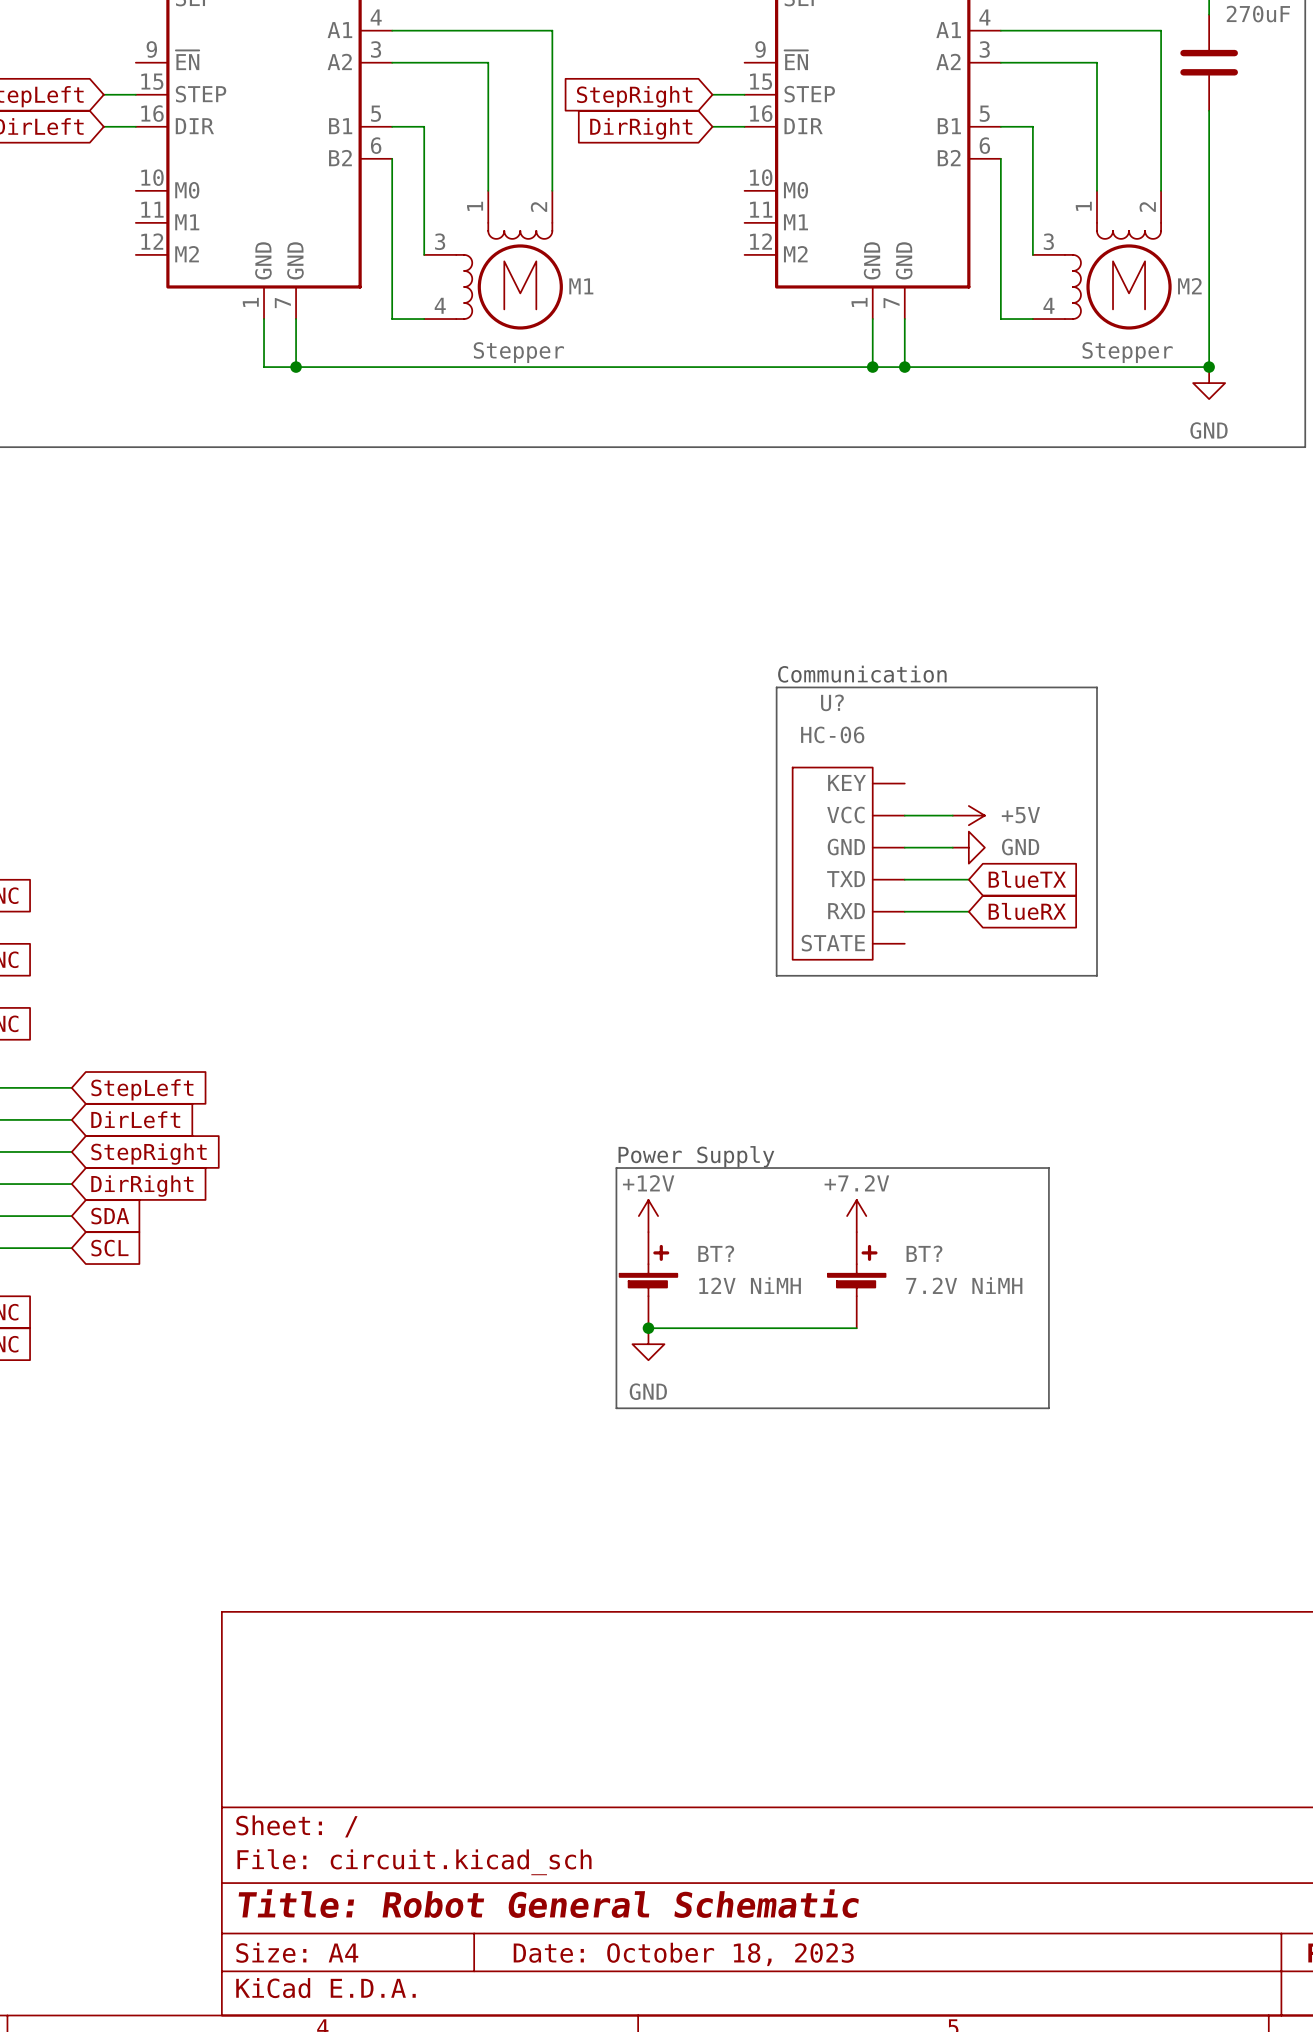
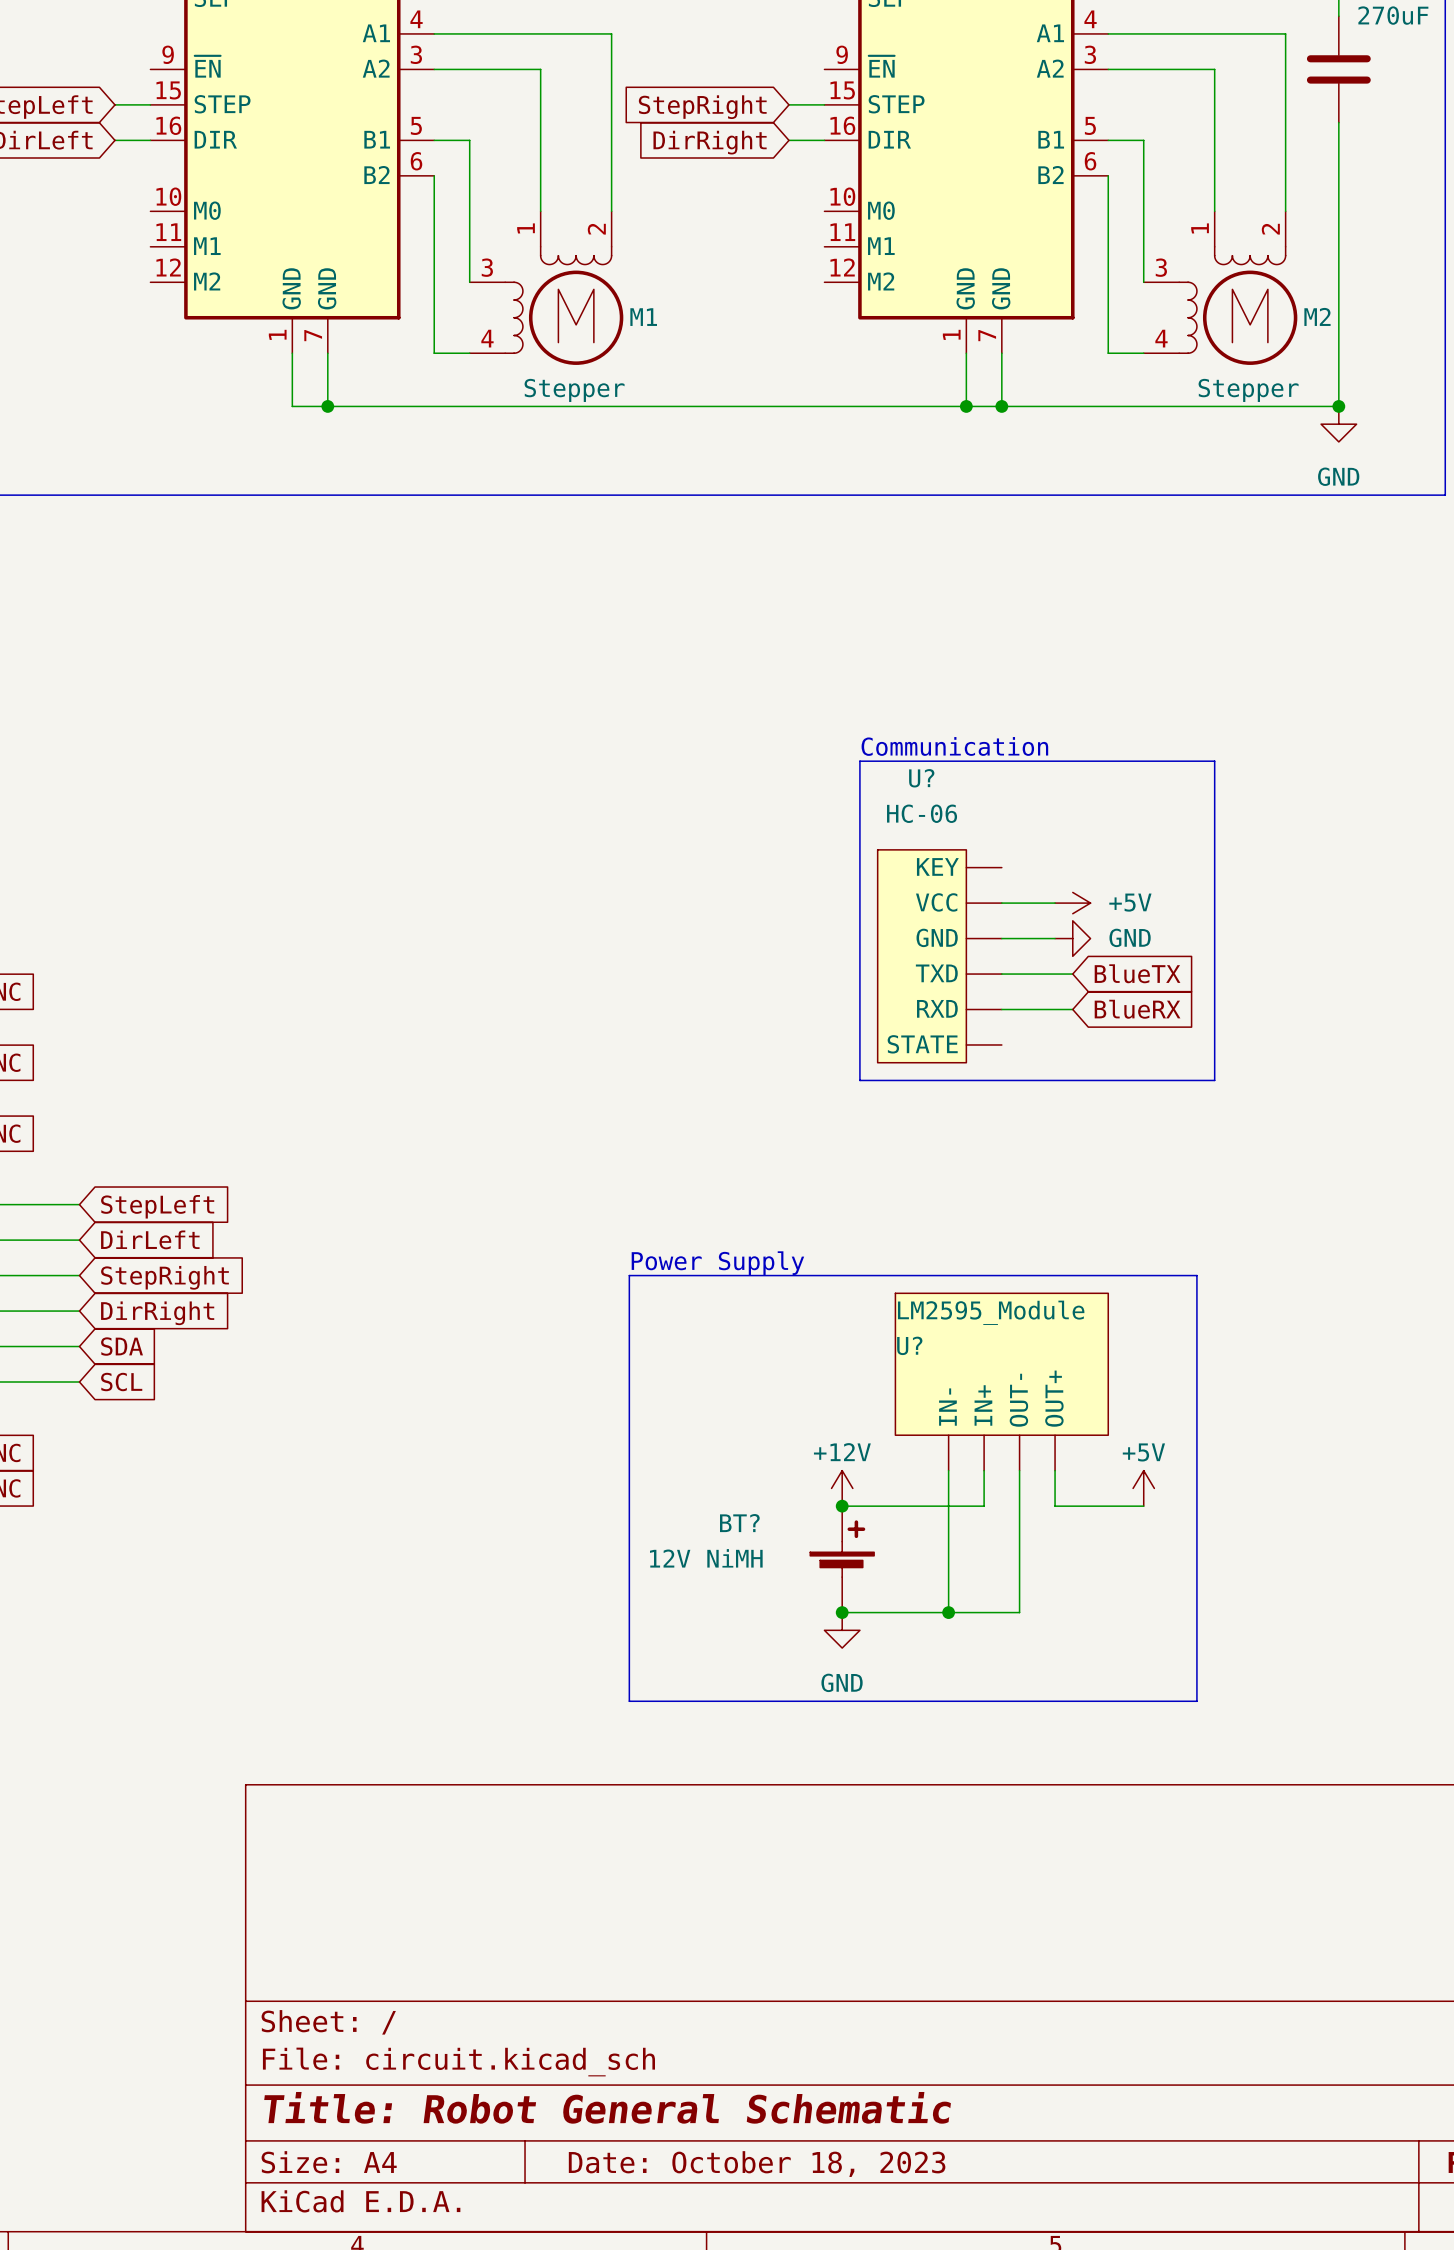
text position: Power Supply (696, 1156) -> Power Supply (717, 1263)
line: (616, 1168) (1048, 1168) (1048, 1408) (616, 1408) (616, 1168) -> (629, 1275) (629, 1701) (1196, 1701) (1196, 1275) (629, 1275)
power symbol position: +12V (648, 1216) -> +12V (842, 1488)
power symbol: +7.2V (856, 1216) -> none
U?: none -> LM2595_Module (1001, 1381)
BT? name position: BT? (716, 1253) -> BT? (739, 1523)
BT? position: (648, 1280) -> (842, 1559)
BT?: 7.2V NiMH (856, 1280) -> none
BT? value position: 12V NiMH (750, 1285) -> 12V NiMH (706, 1558)
wire: (648, 1328) (856, 1328) -> (948, 1612) (948, 1470)
junction: (648, 1328) -> none
wire: none -> (984, 1470) (984, 1506) (842, 1506)
wire: none -> (1019, 1470) (1019, 1612) (842, 1612)
wire: none -> (1055, 1470) (1055, 1506) (1143, 1506)
power symbol position: GND (648, 1344) -> GND (842, 1630)
power symbol: none -> +5V (1143, 1488)
junction: none -> (842, 1506)
junction: none -> (842, 1612)
junction: none -> (948, 1612)

